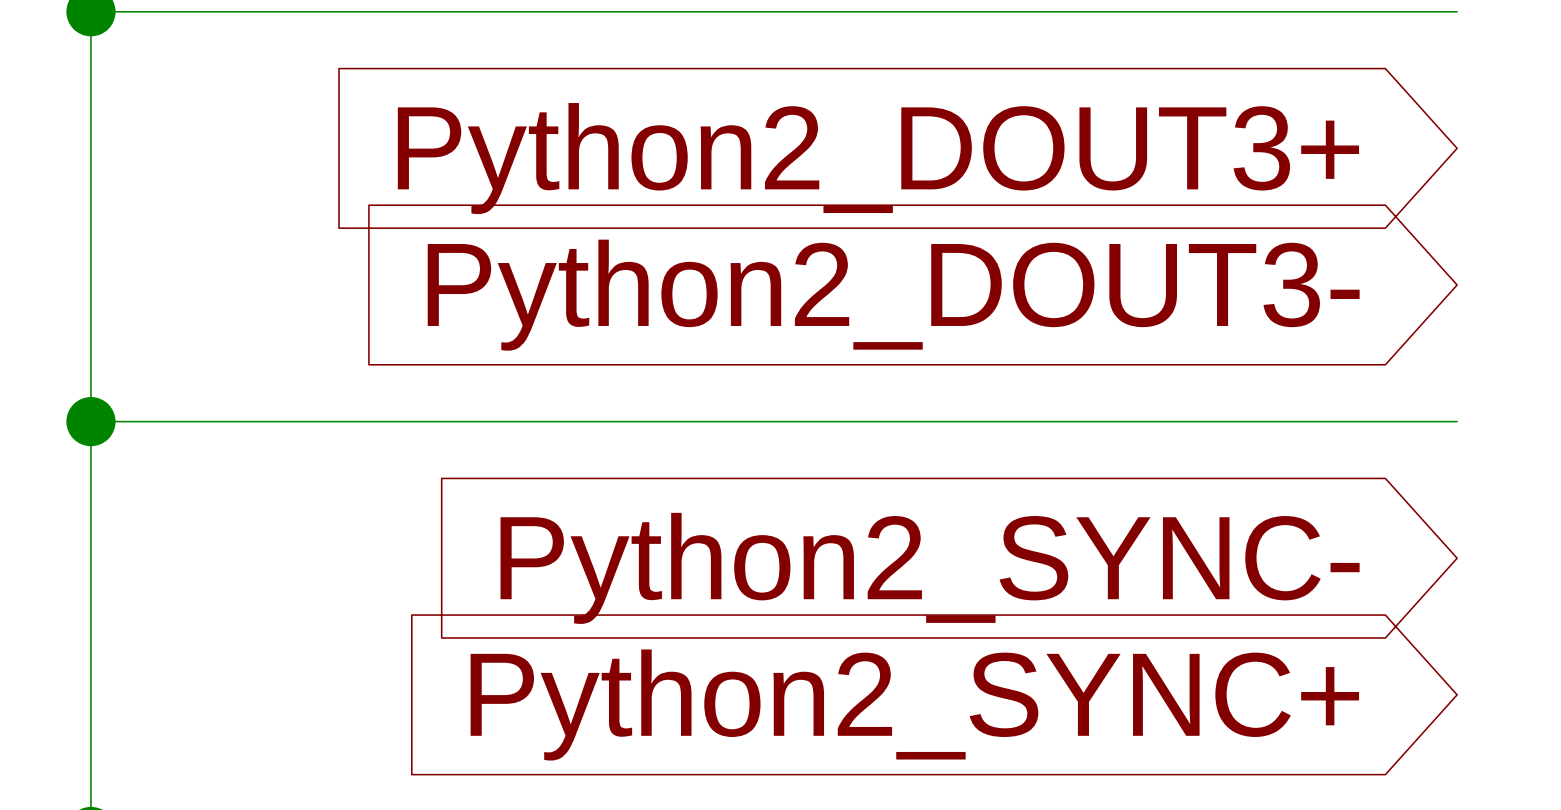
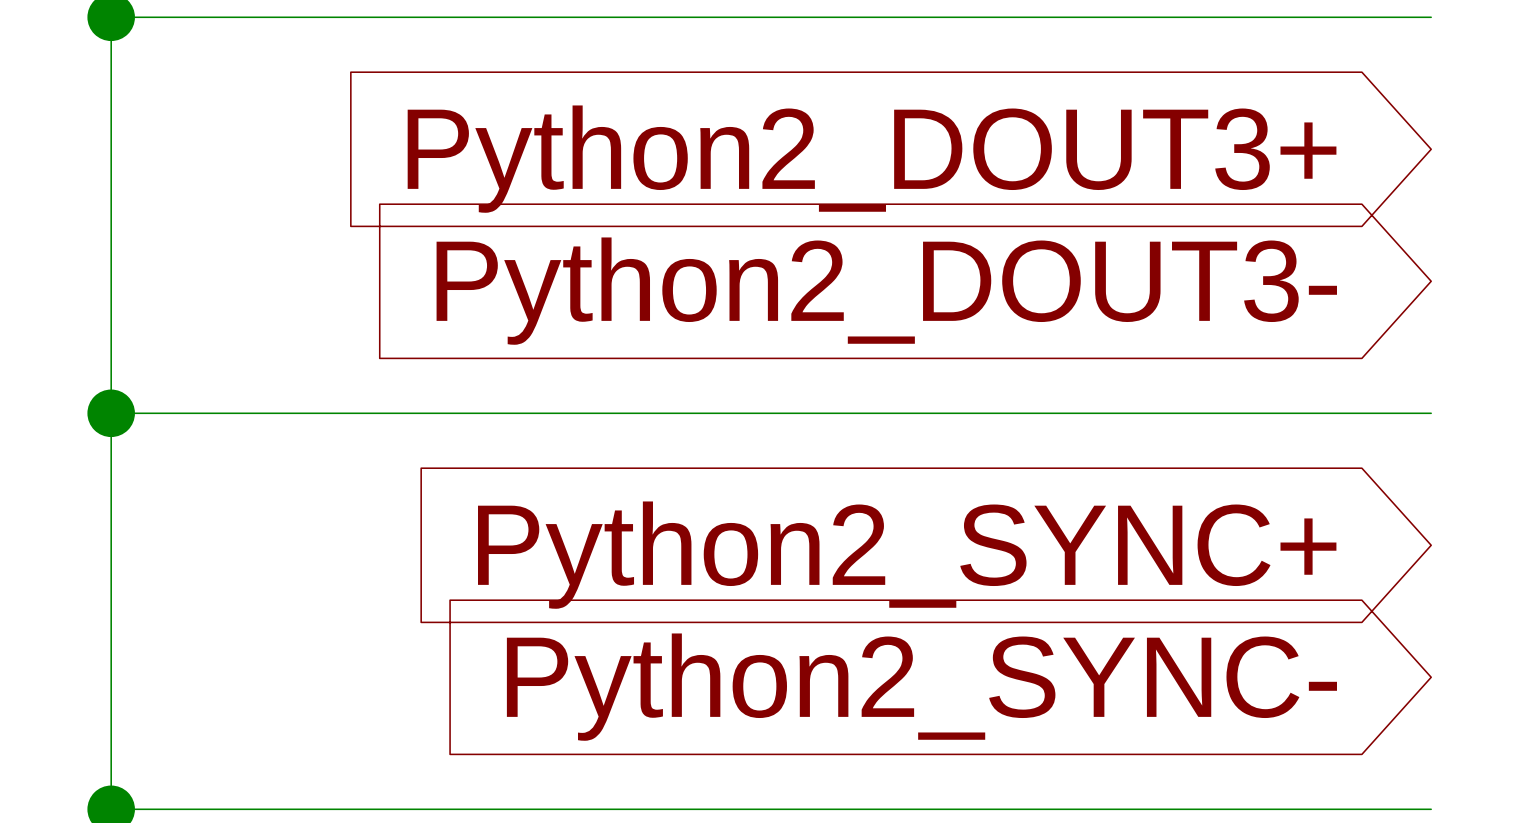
global label: Python2_SYNC- (930, 568) -> Python2_SYNC+ (907, 555)
global label: Python2_SYNC+ (914, 705) -> Python2_SYNC- (921, 687)

